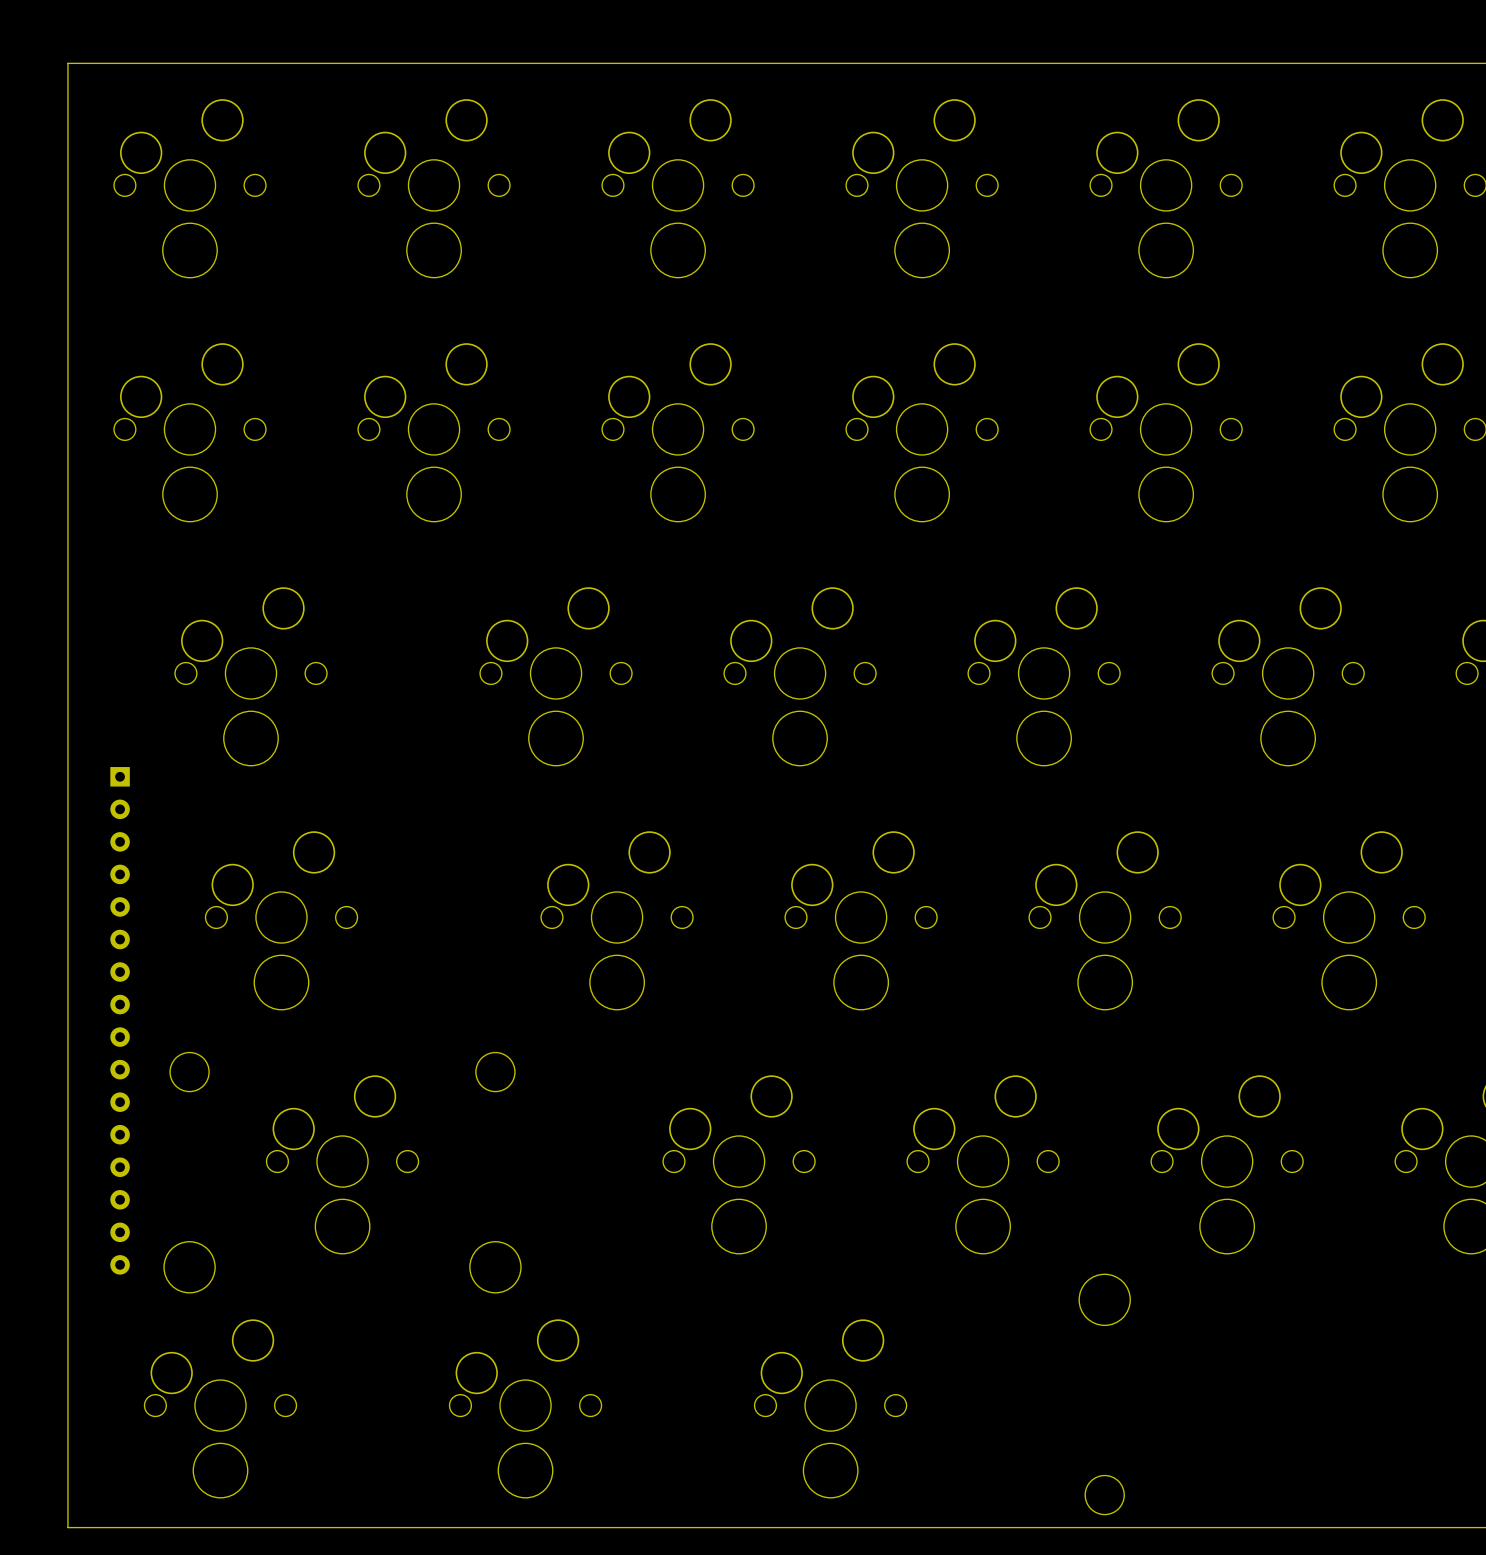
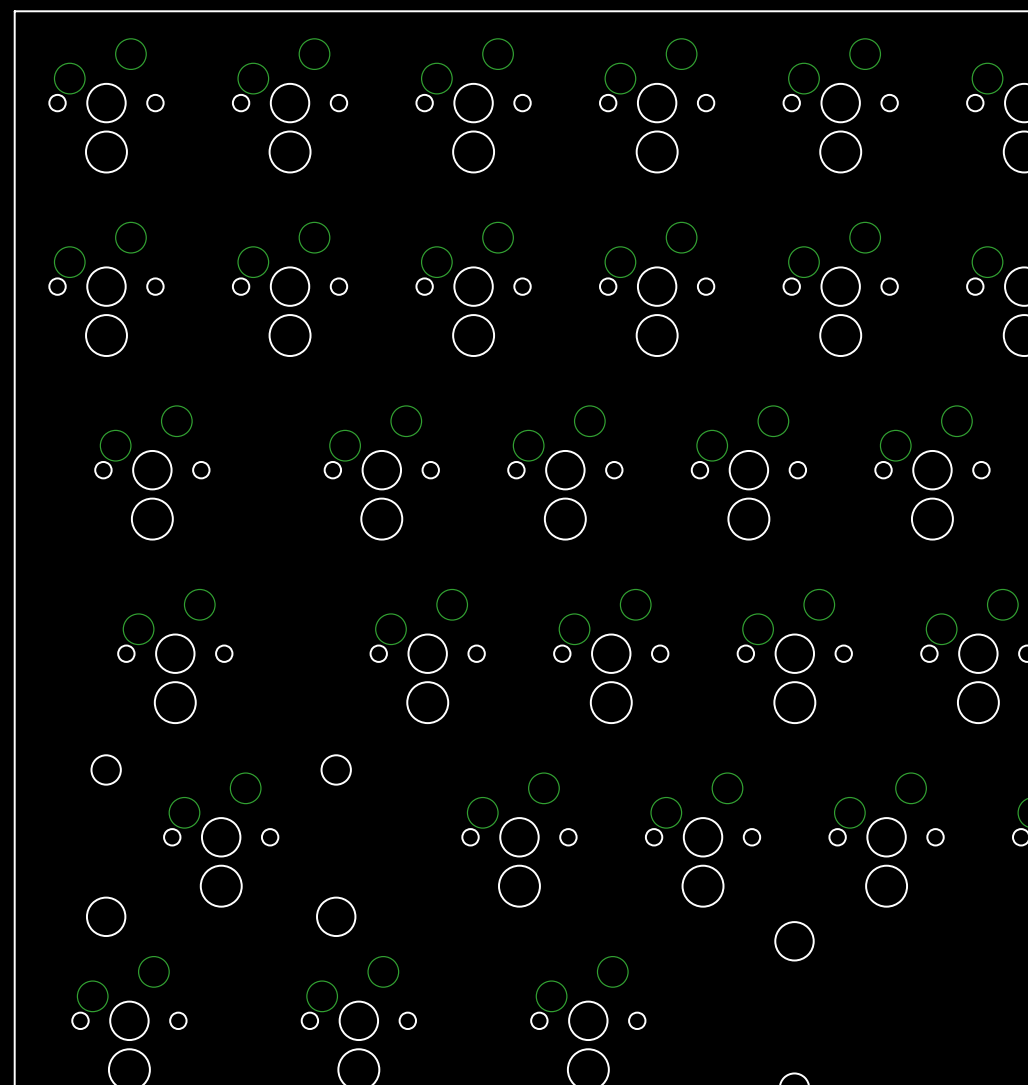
part: (120, 1020) -> none

